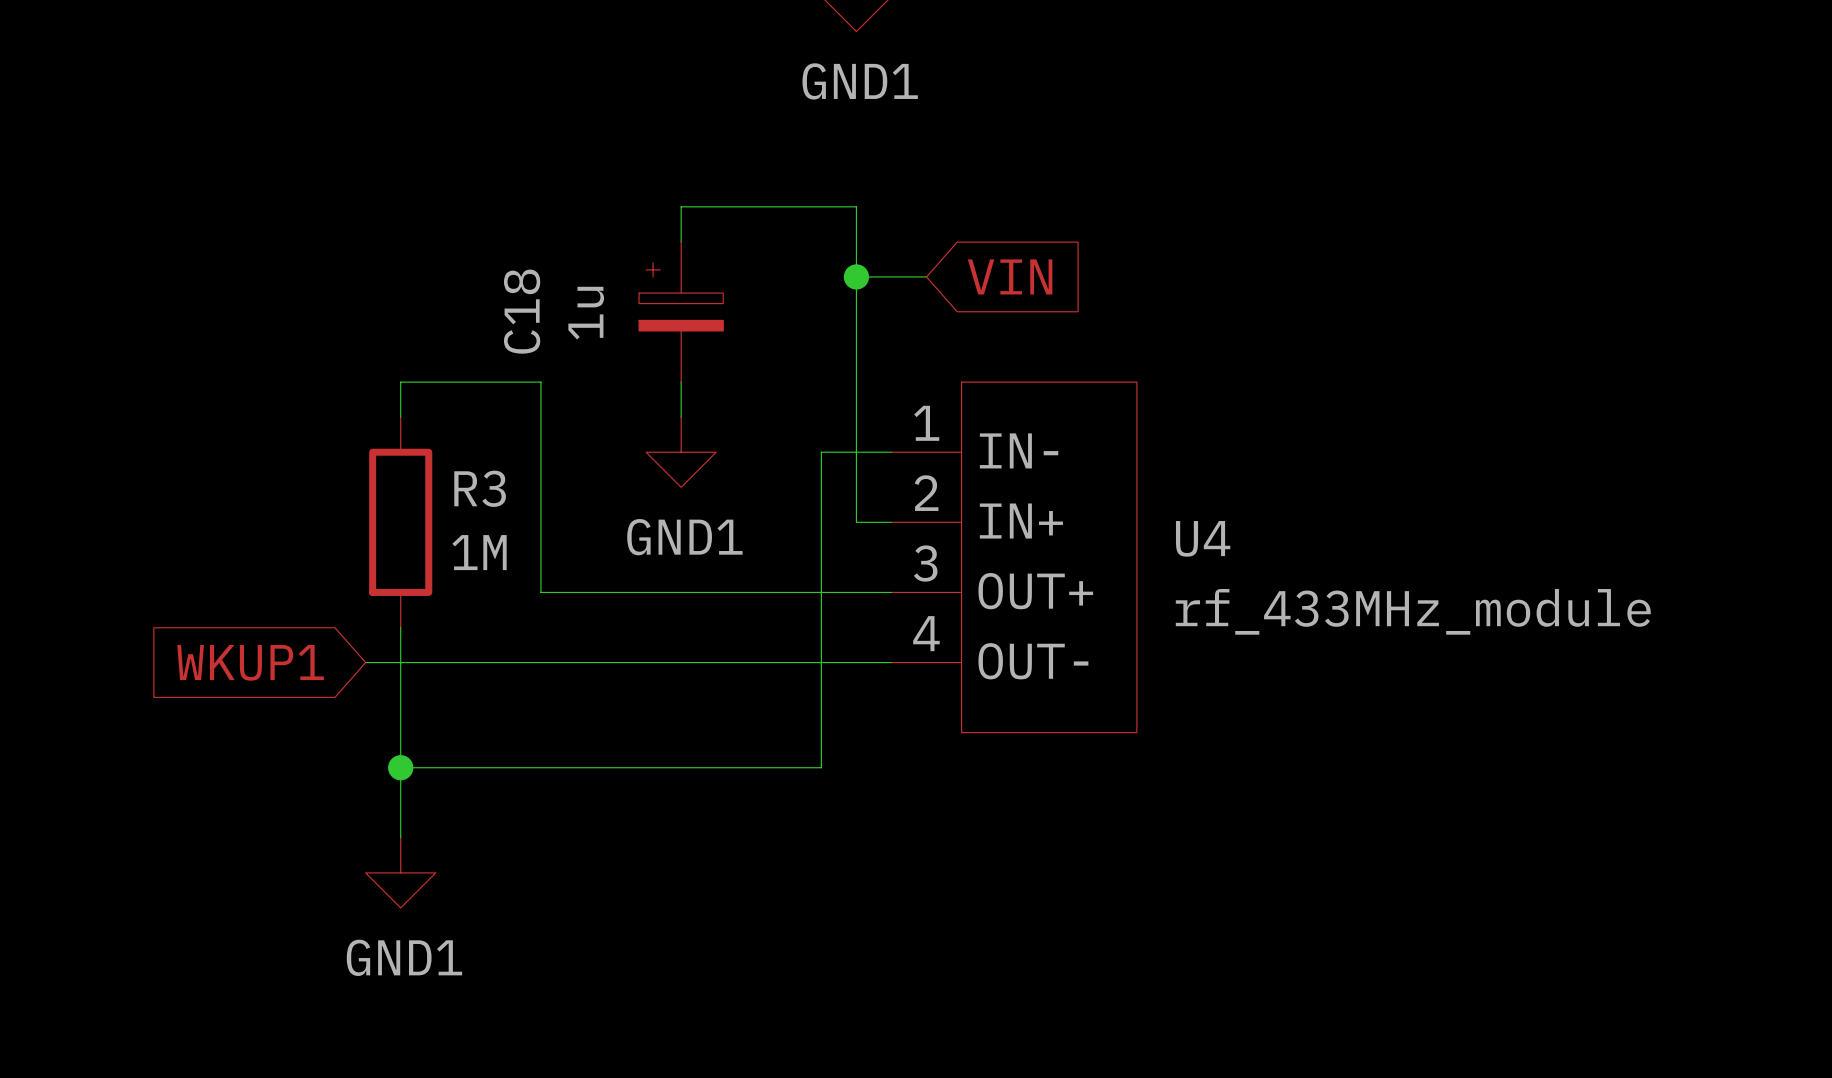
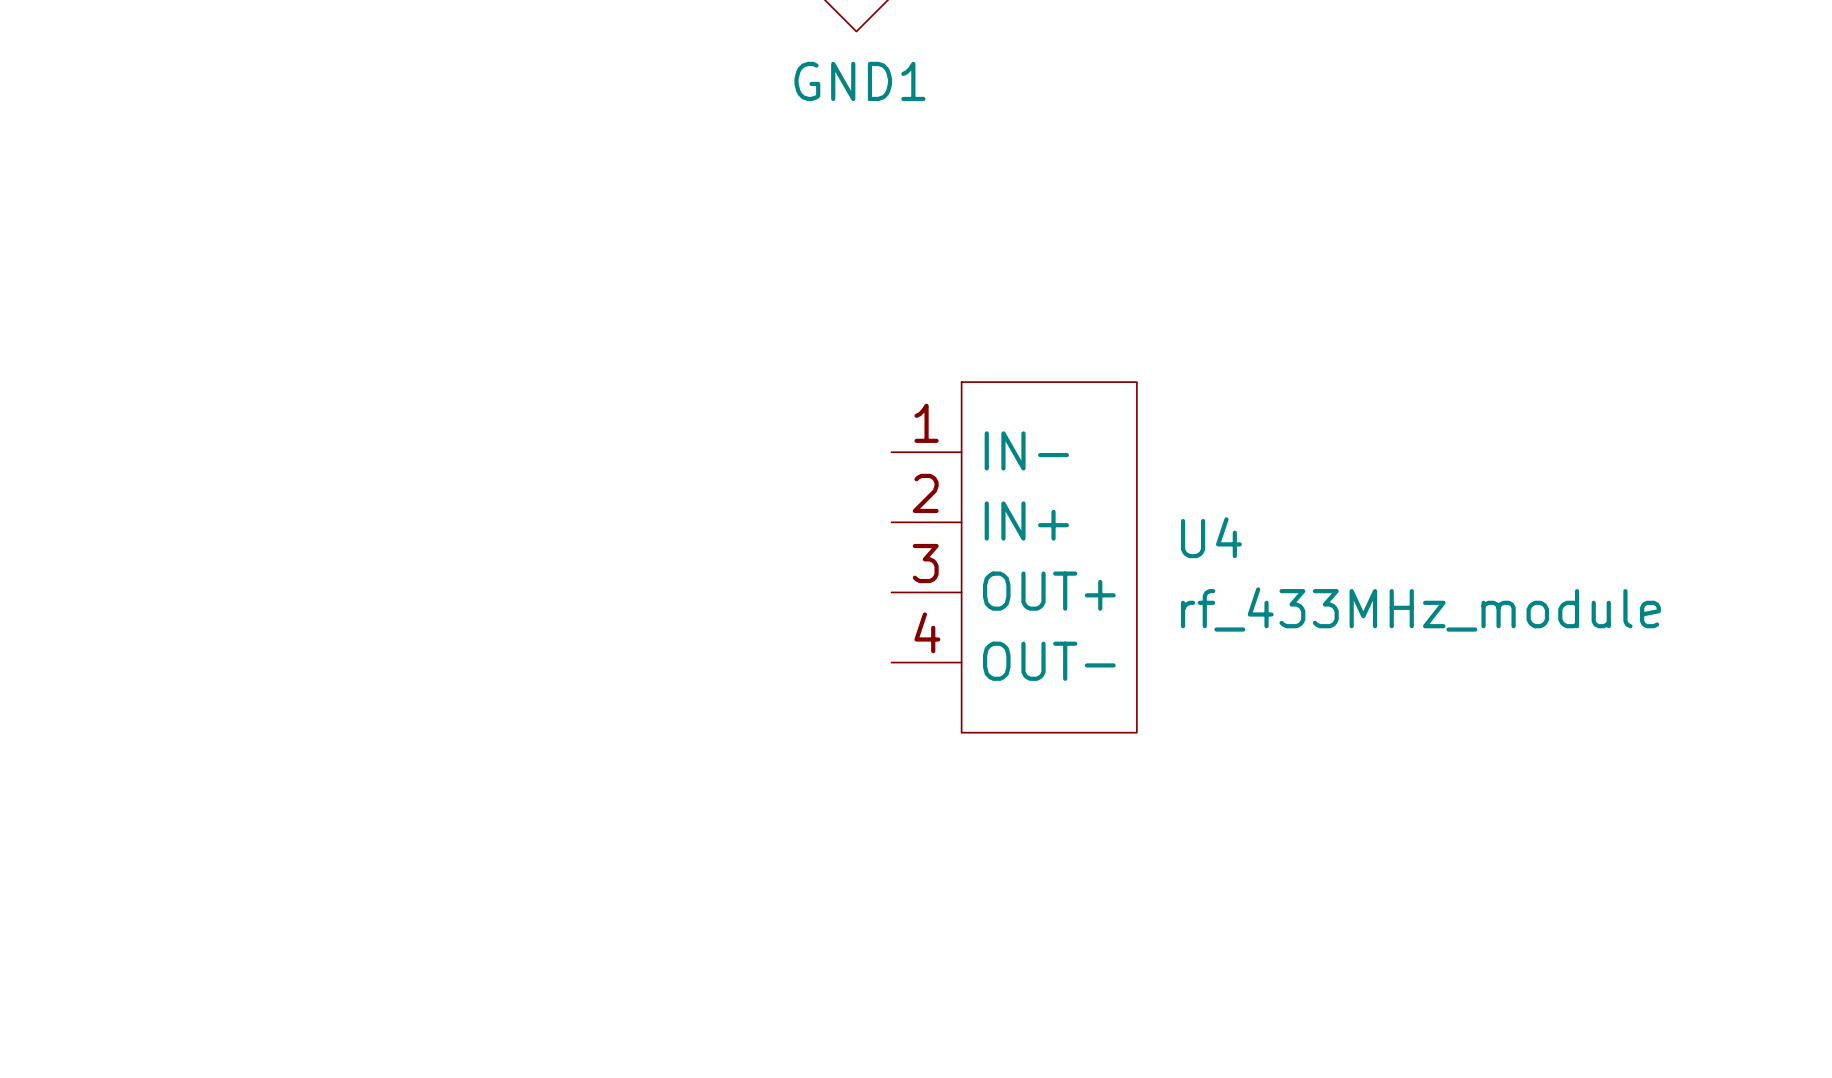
wire: (681, 241) (681, 206) (856, 206) (856, 522) (891, 522) -> none
wire: (856, 276) (926, 276) -> none
junction: (856, 276) -> none
global label: VIN (1010, 276) -> none
C18: 1u (681, 312) -> none
wire: (681, 382) (681, 417) -> none
wire: (400, 417) (400, 382) (540, 382) (540, 592) (891, 592) -> none
power symbol: GND1 (681, 452) -> none
wire: (891, 452) (821, 452) (821, 767) (400, 767) -> none
R3: 1M (400, 522) -> none
wire: (400, 627) (400, 837) -> none
global label: WKUP1 (250, 662) -> none
wire: (365, 662) (891, 662) -> none
junction: (400, 767) -> none
power symbol: GND1 (400, 872) -> none

